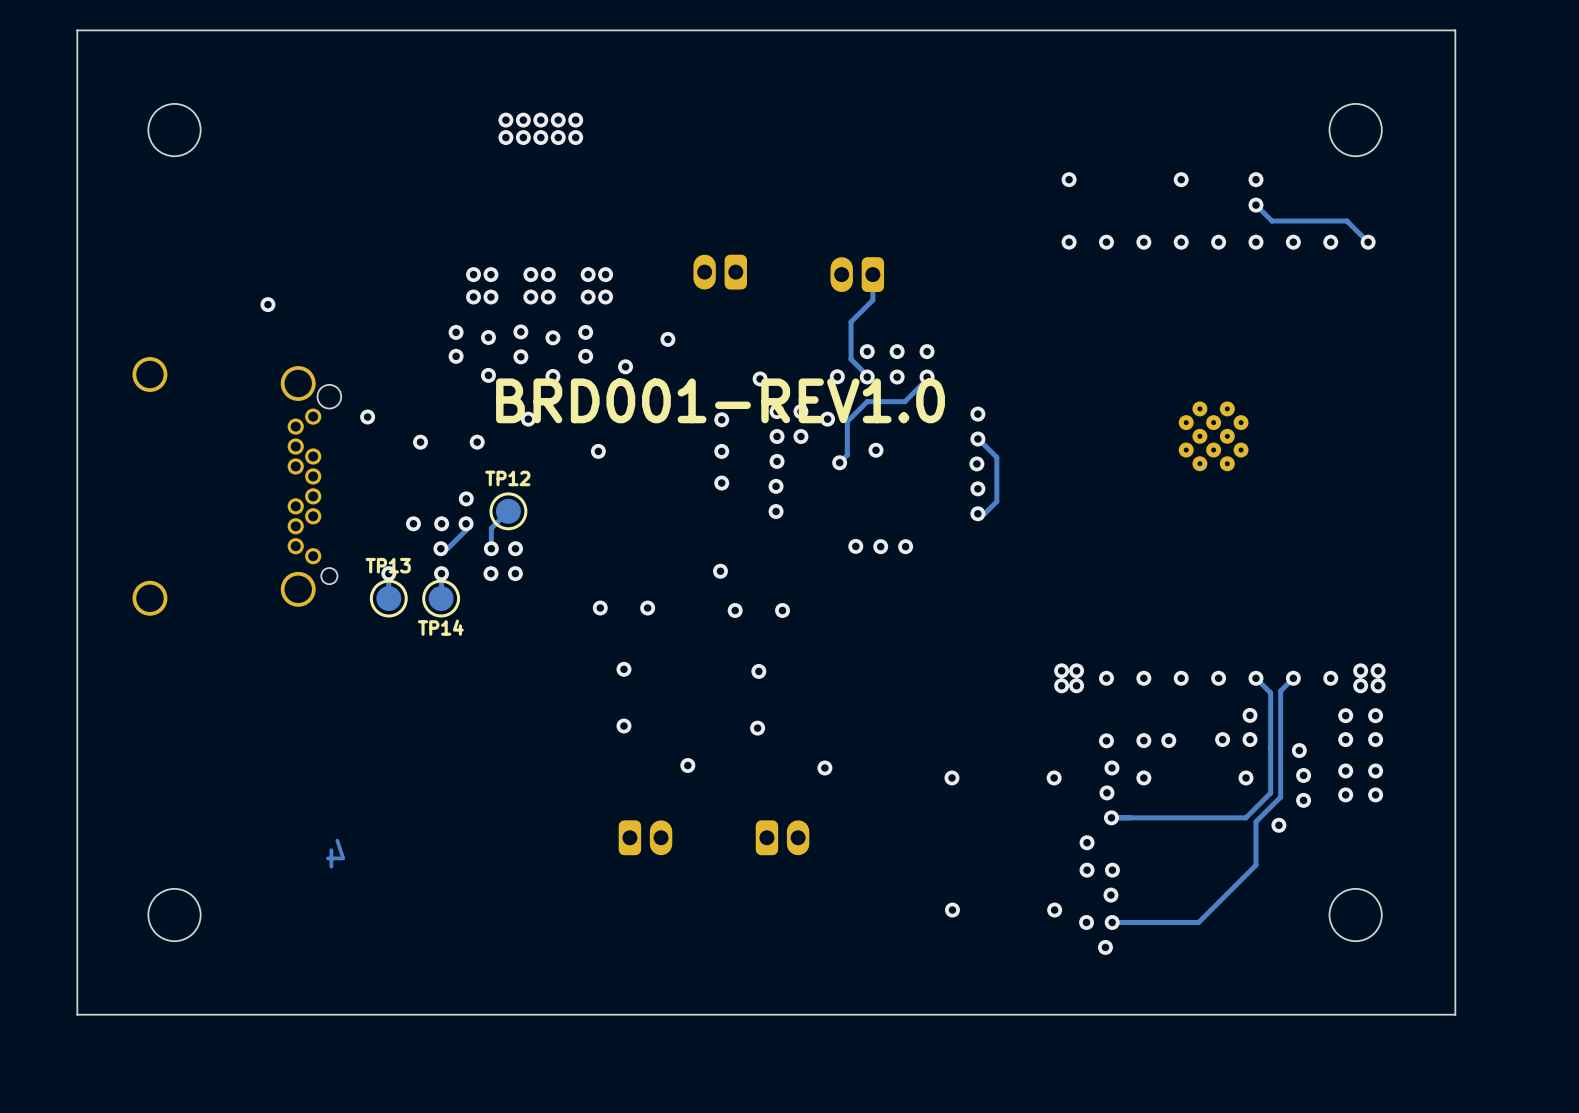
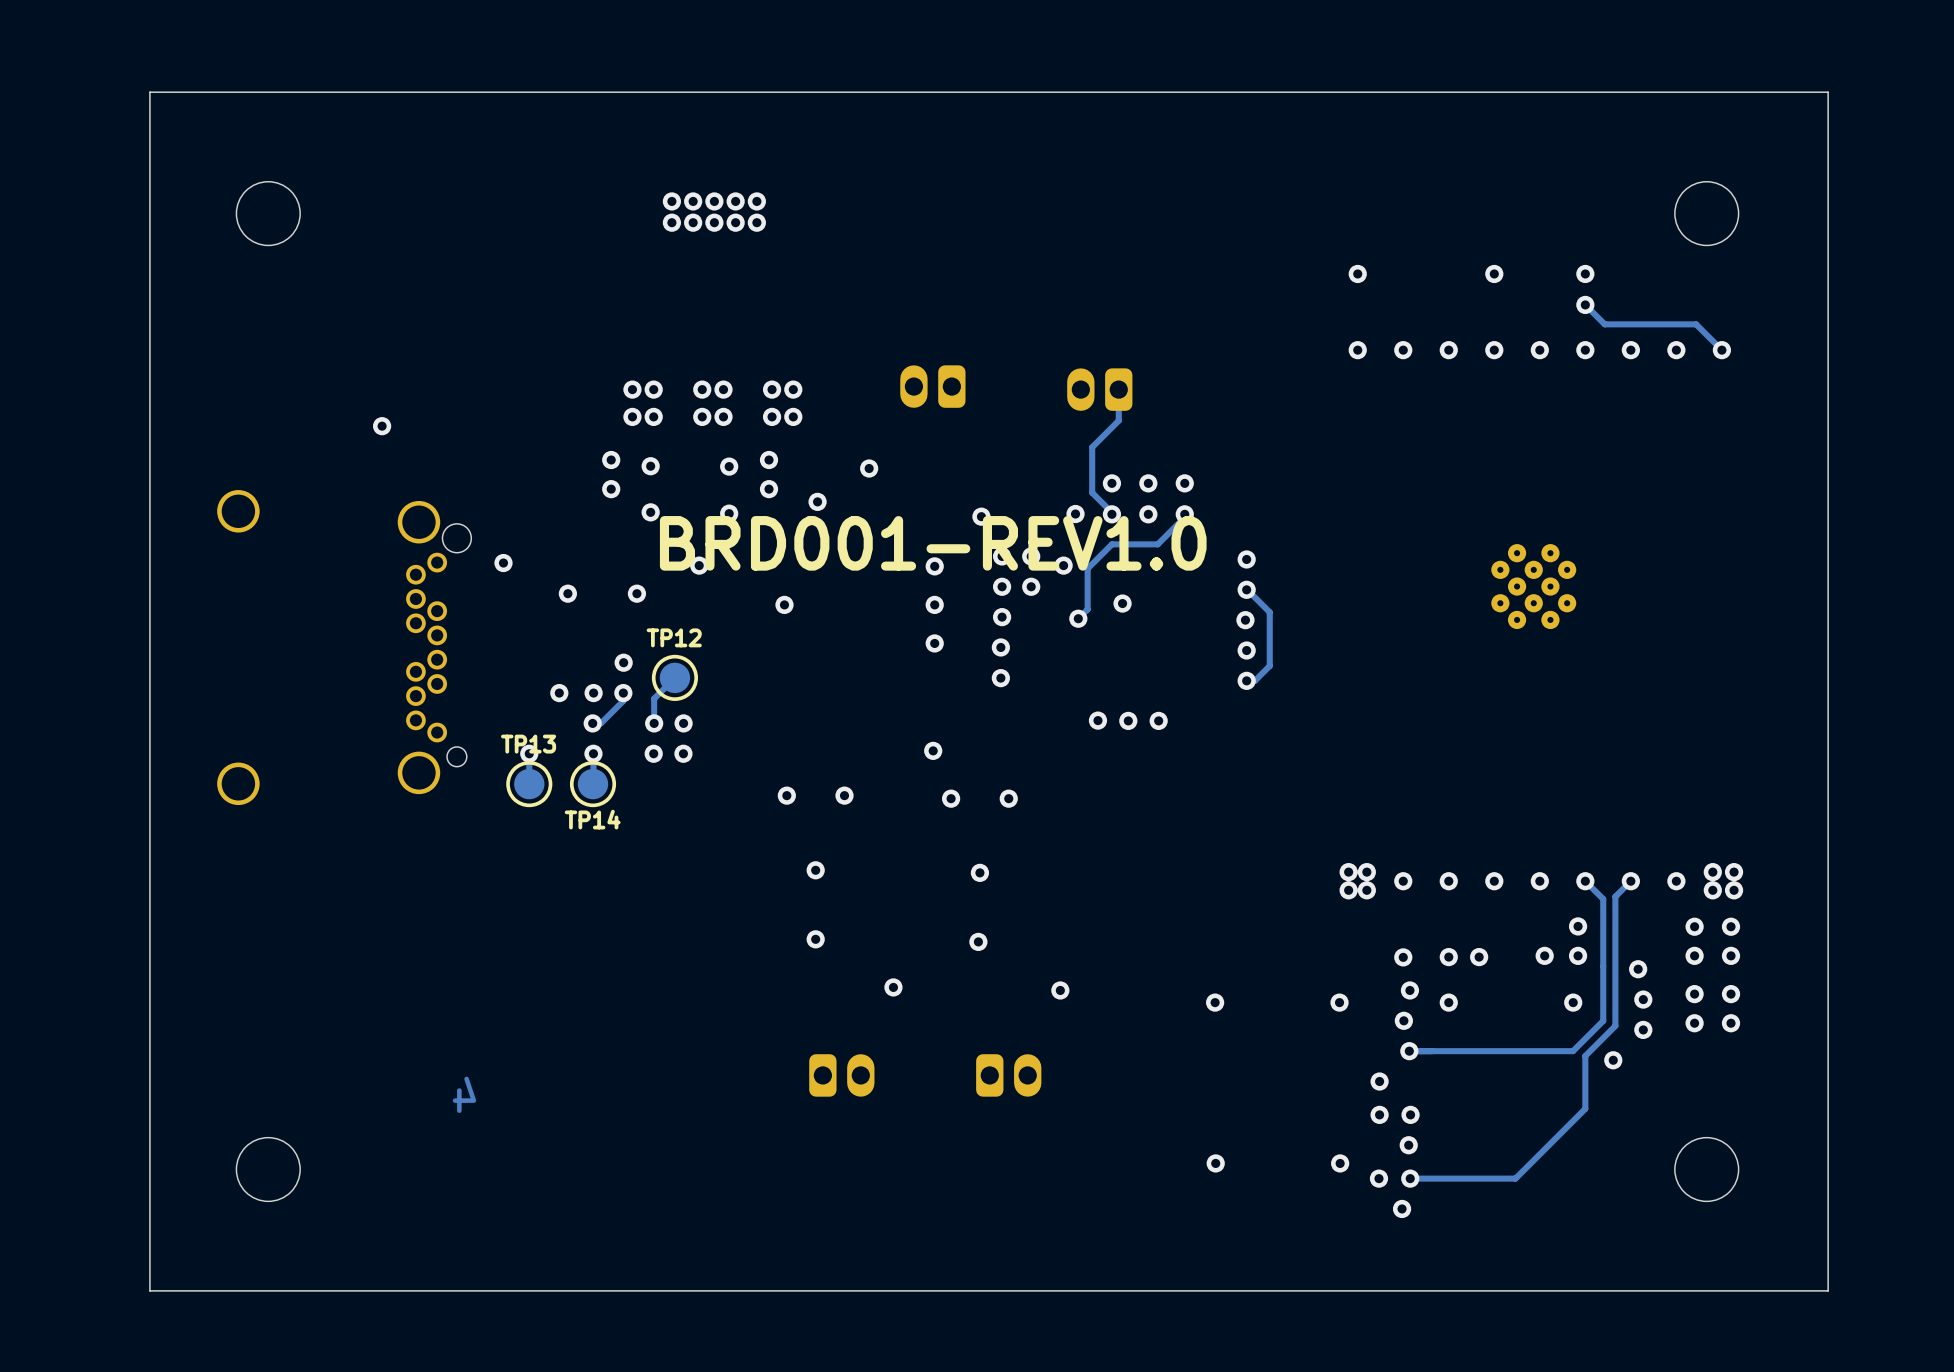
via: (520, 331) -> none
via: (520, 356) -> none

